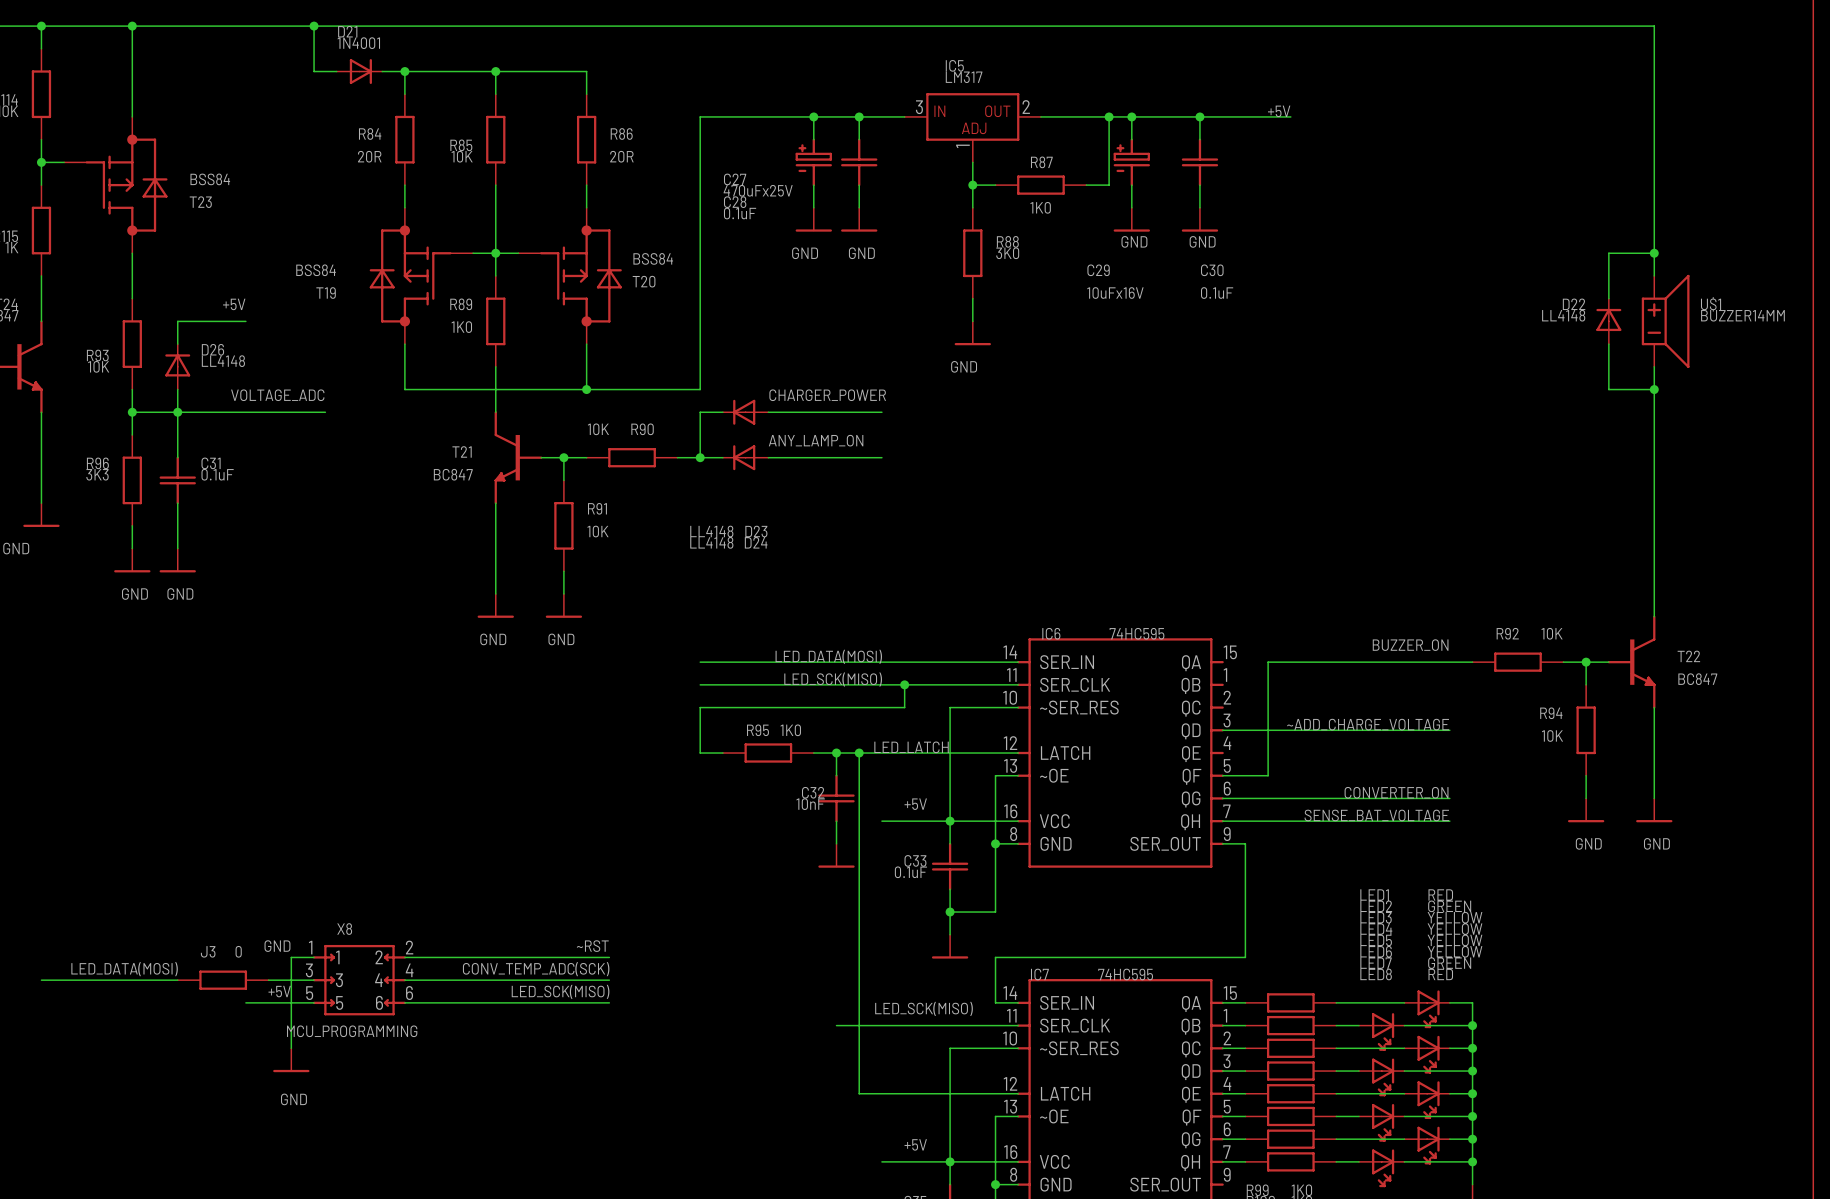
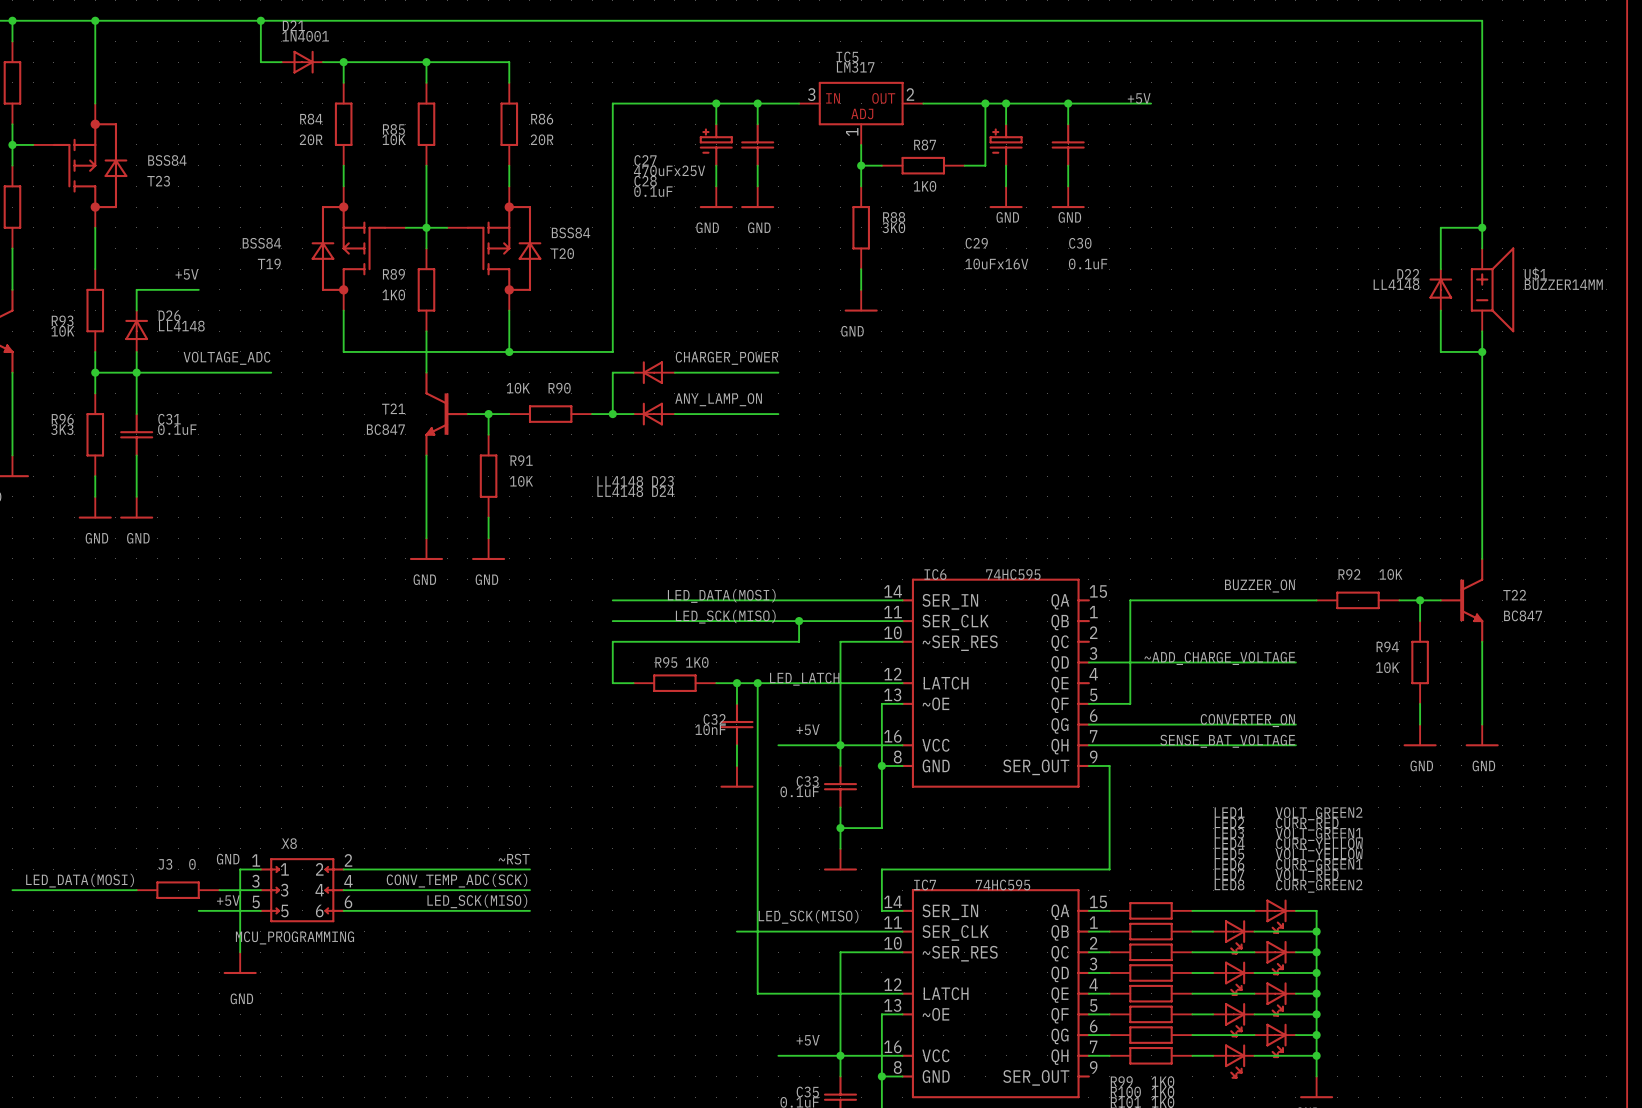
LED1 value: RED (1440, 894) -> VOLT_GREEN2 (1319, 813)
LED2 value: GREEN (1449, 906) -> CURR_RED (1307, 824)
LED3 value: YELLOW (1455, 917) -> VOLT_GREEN1 (1319, 834)
LED4 value: YELLOW (1455, 929) -> CURR_YELLOW (1319, 844)
LED5 value: YELLOW (1455, 940) -> VOLT_YELLOW (1319, 855)
LED6 value: YELLOW (1455, 951) -> CURR_GREEN1 (1319, 865)
LED7 value: GREEN (1449, 963) -> VOLT_RED (1307, 875)
LED8 value: RED (1440, 974) -> CURR_GREEN2 (1319, 886)

